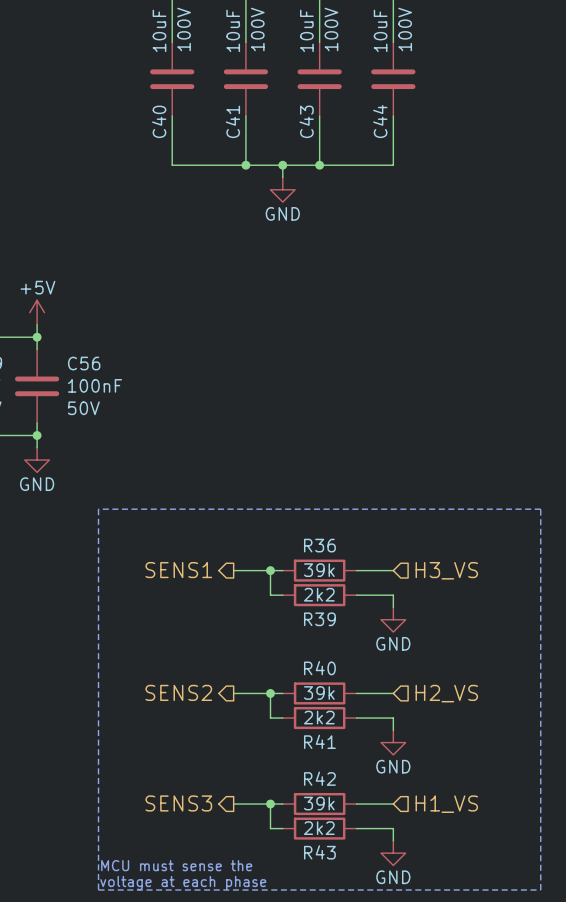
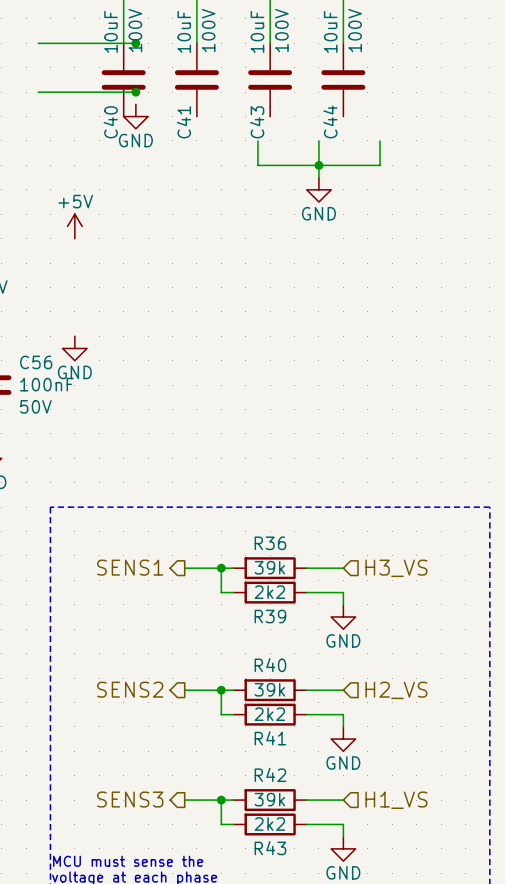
wire: none -> (38, 43) (135, 43)
junction: none -> (135, 43)
wire: none -> (38, 92) (135, 92)
junction: none -> (135, 92)
wire: (172, 116) (172, 165) (307, 165) -> (257, 140) (257, 165)
power symbol: none -> GND (135, 116)
wire: (245, 116) (245, 165) -> none
wire: (319, 116) (319, 165) -> none
wire: (393, 116) (393, 165) -> (379, 140) (379, 165) (343, 165)
wire: none -> (318, 140) (318, 177)
junction: (245, 165) -> none
wire: (282, 165) (282, 177) -> none
junction: (282, 165) -> none
junction: (319, 165) -> none
junction: none -> (318, 165)
power symbol: GND (282, 189) -> none
power symbol: none -> GND (318, 189)
power symbol: none -> +5V (74, 226)
power symbol: none -> GND (74, 348)

